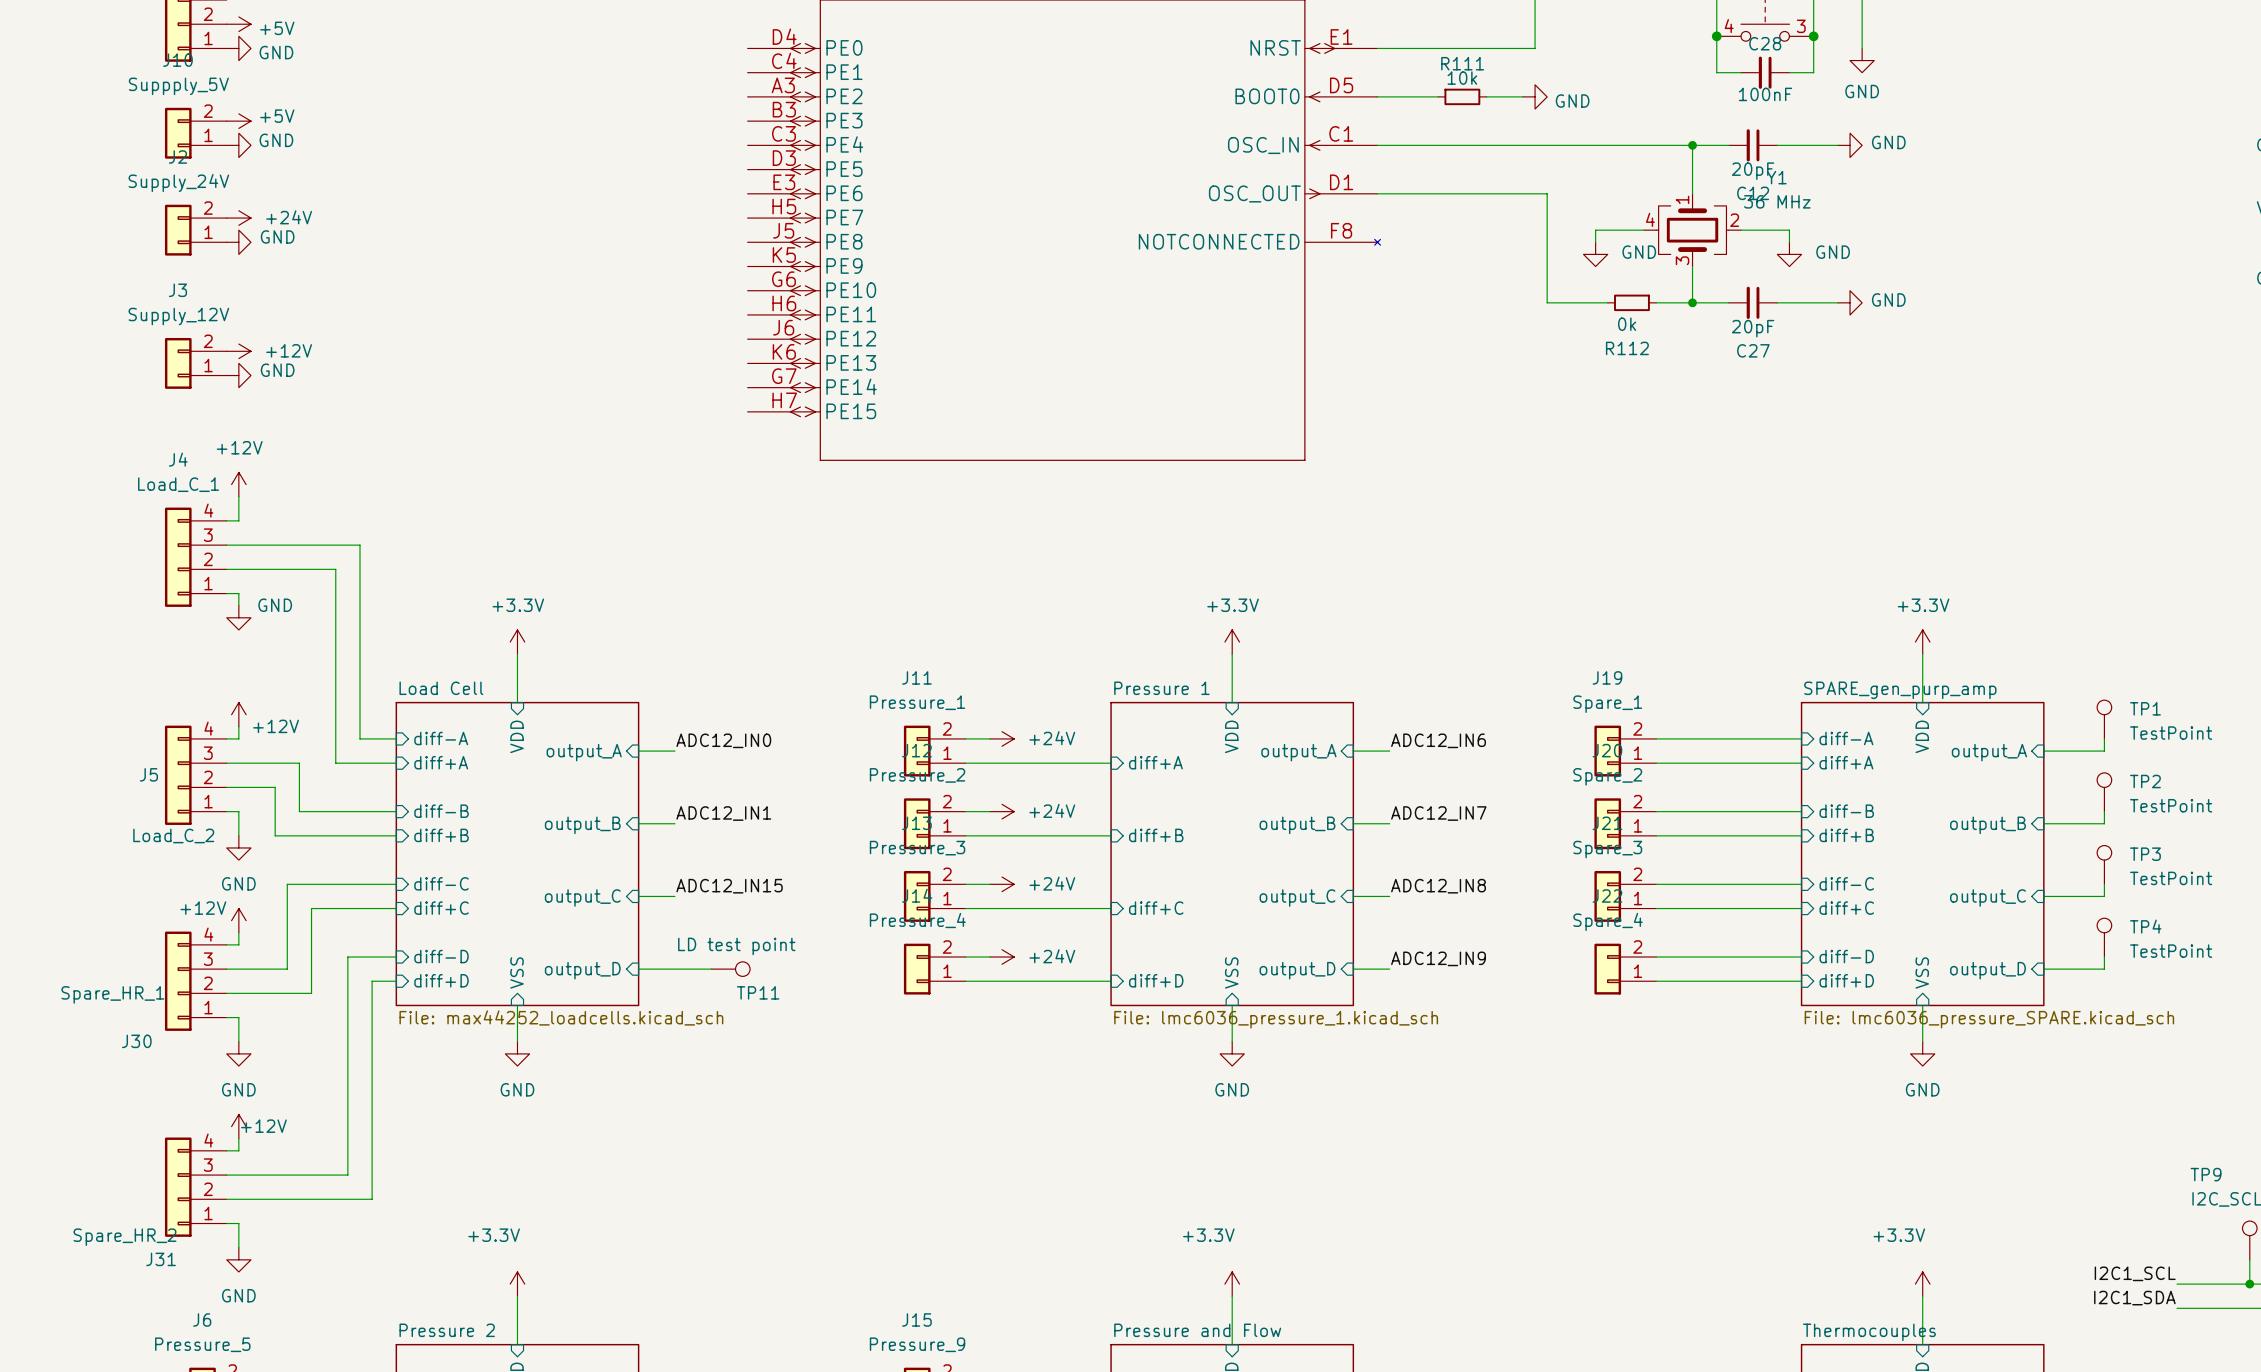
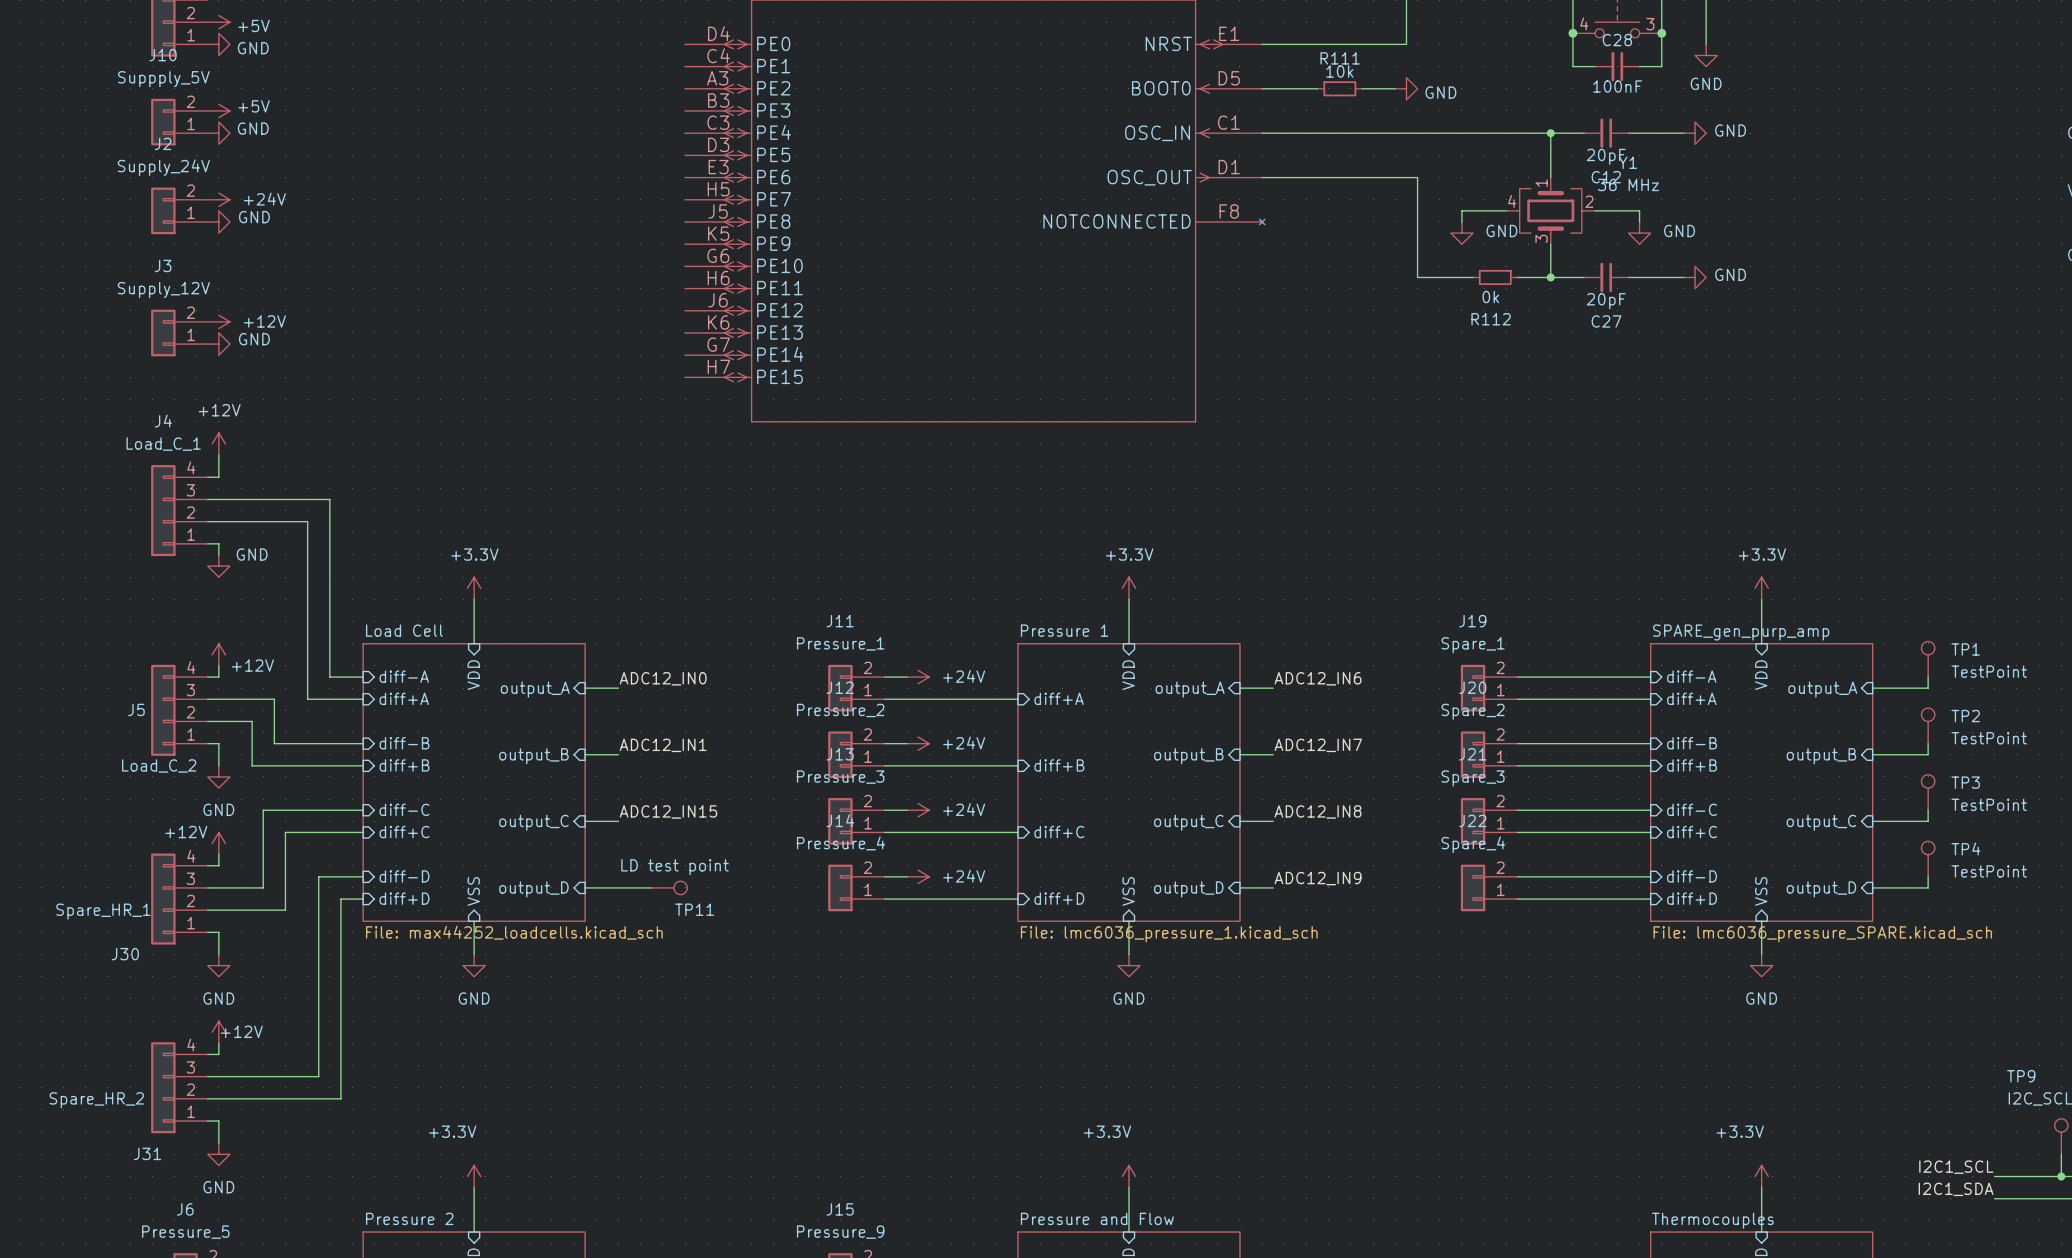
J31 value position: Spare_HR_2 (124, 1237) -> Spare_HR_2 (96, 1100)

